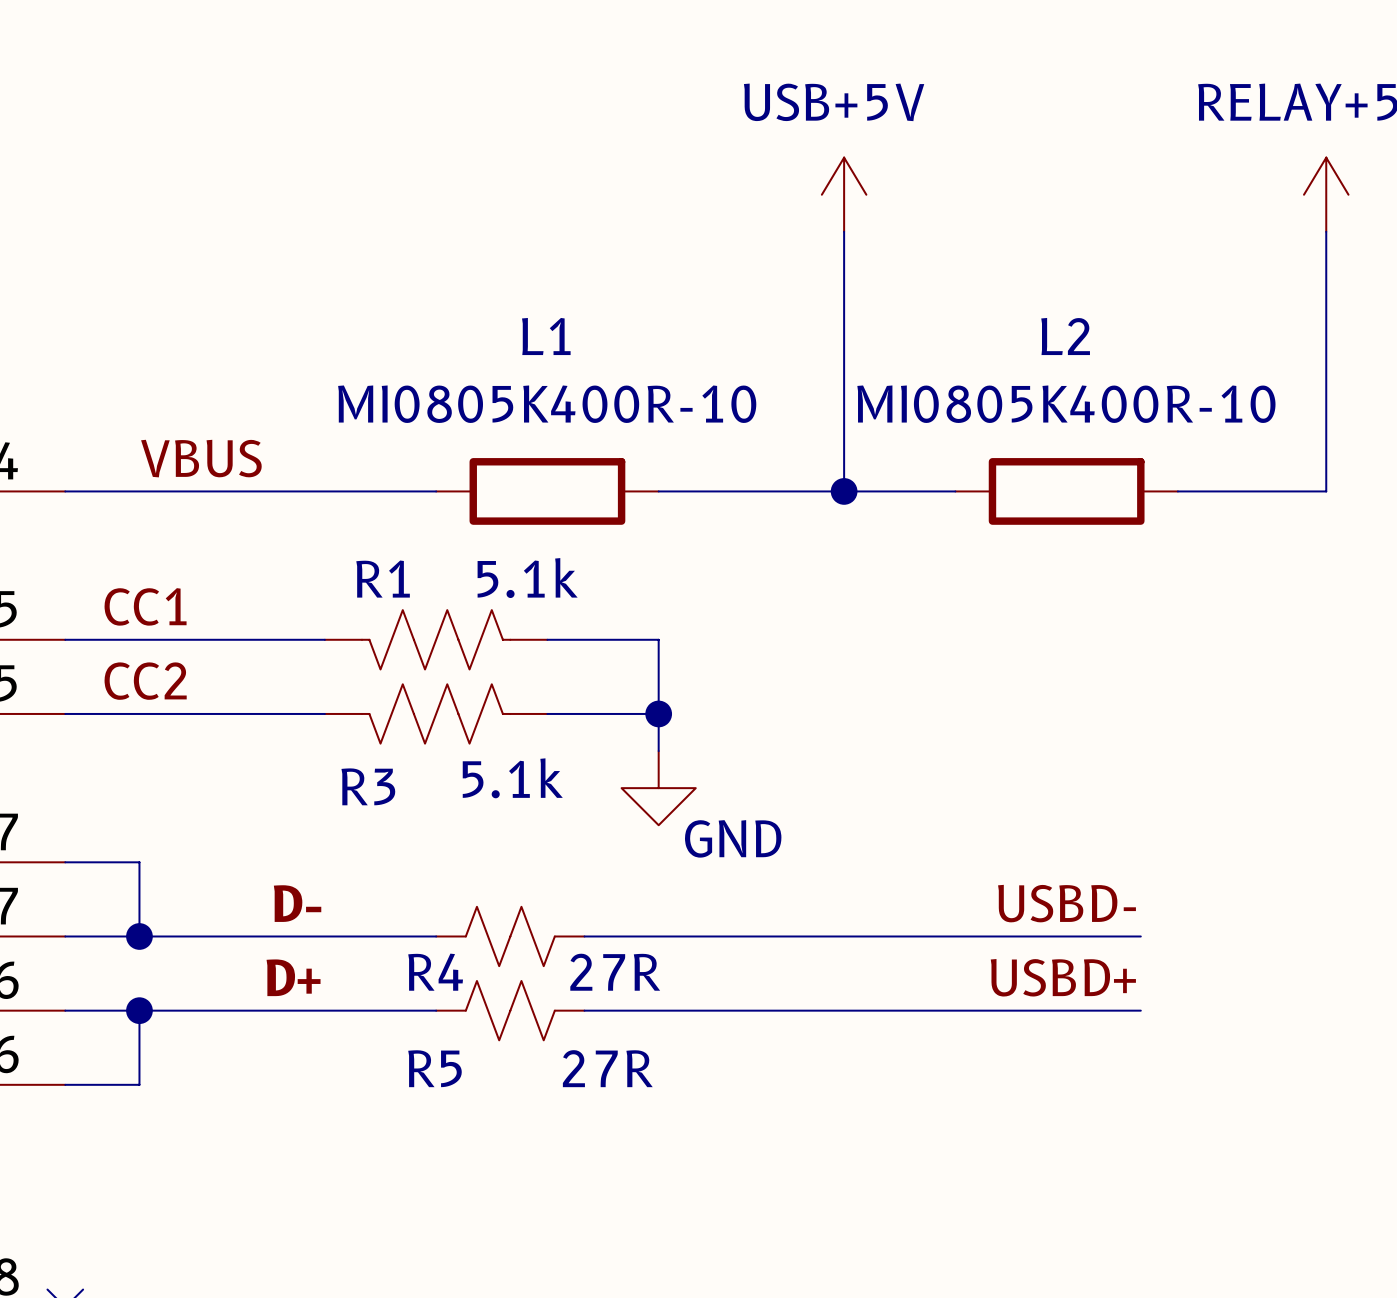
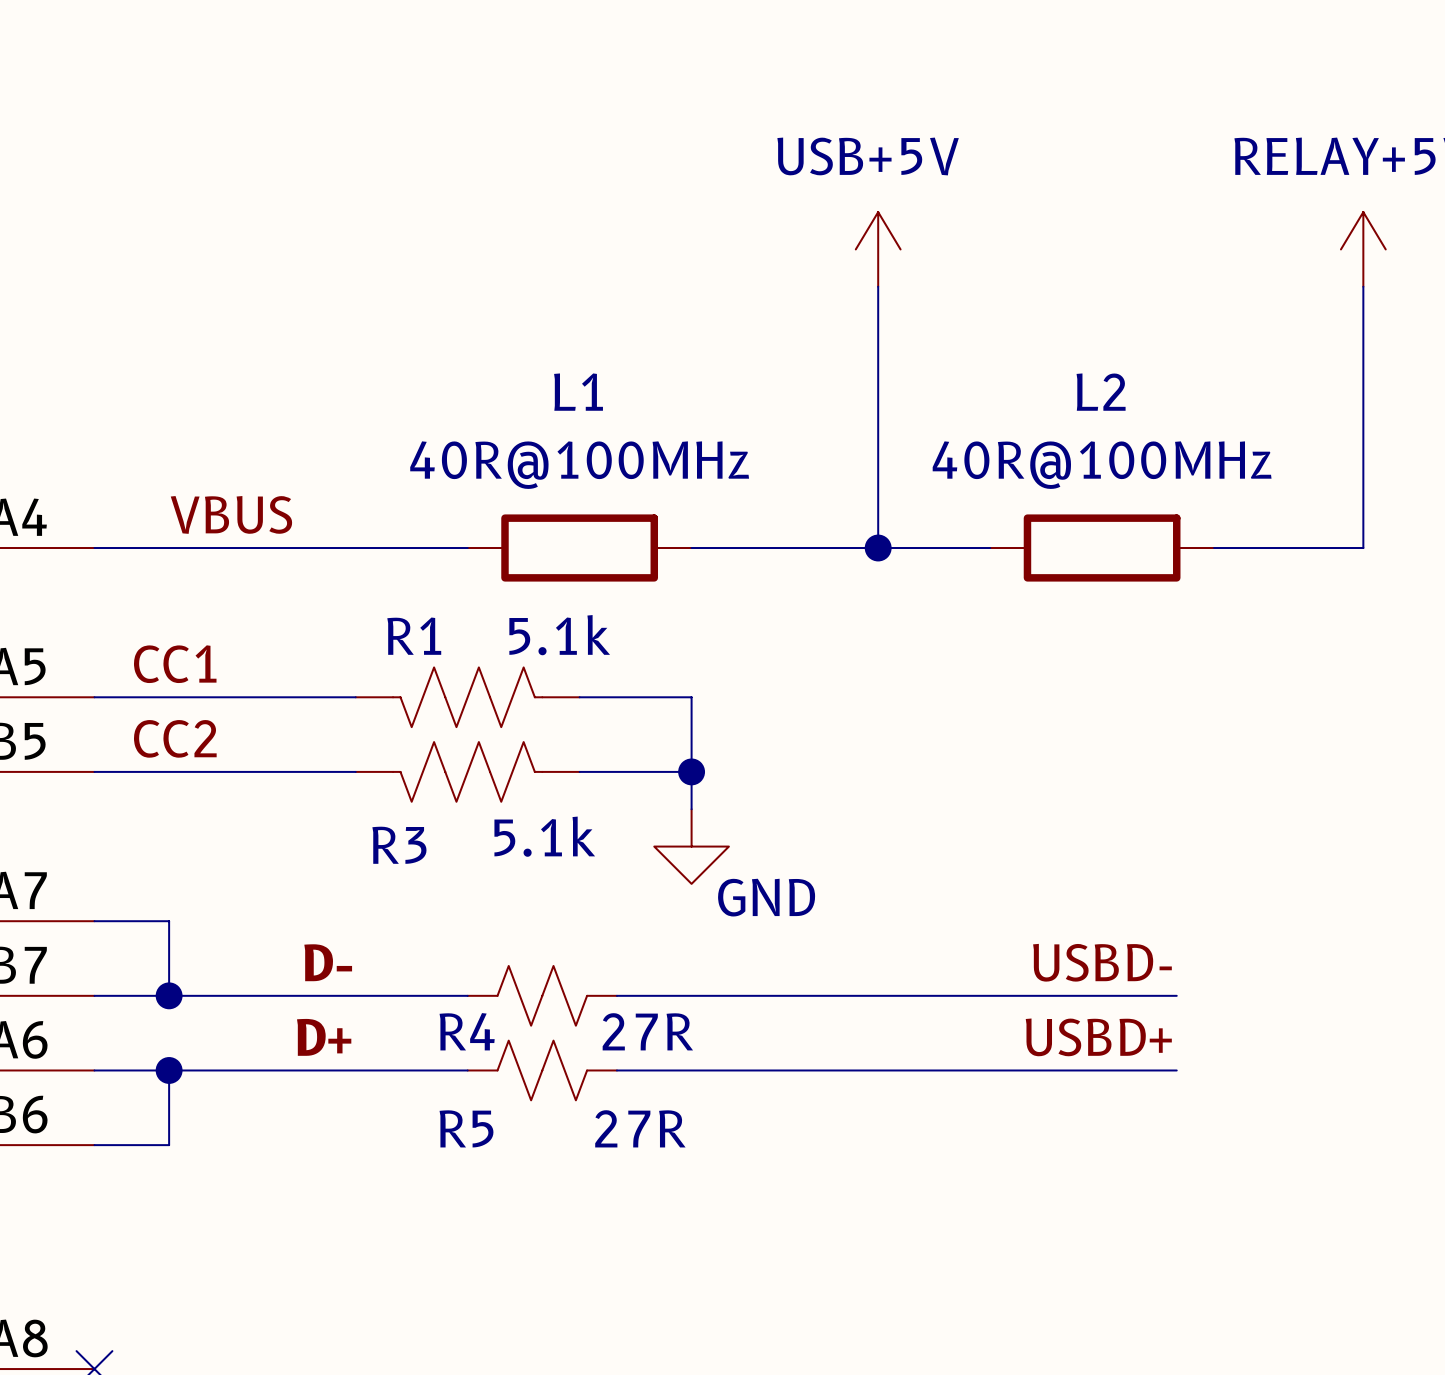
L1 value: MI0805K400R-10 (547, 404) -> 40R@100MHz (579, 465)
L2 value: MI0805K400R-10 (1066, 404) -> 40R@100MHz (1102, 465)

